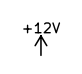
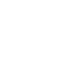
power symbol: +12V (40, 45) -> none

